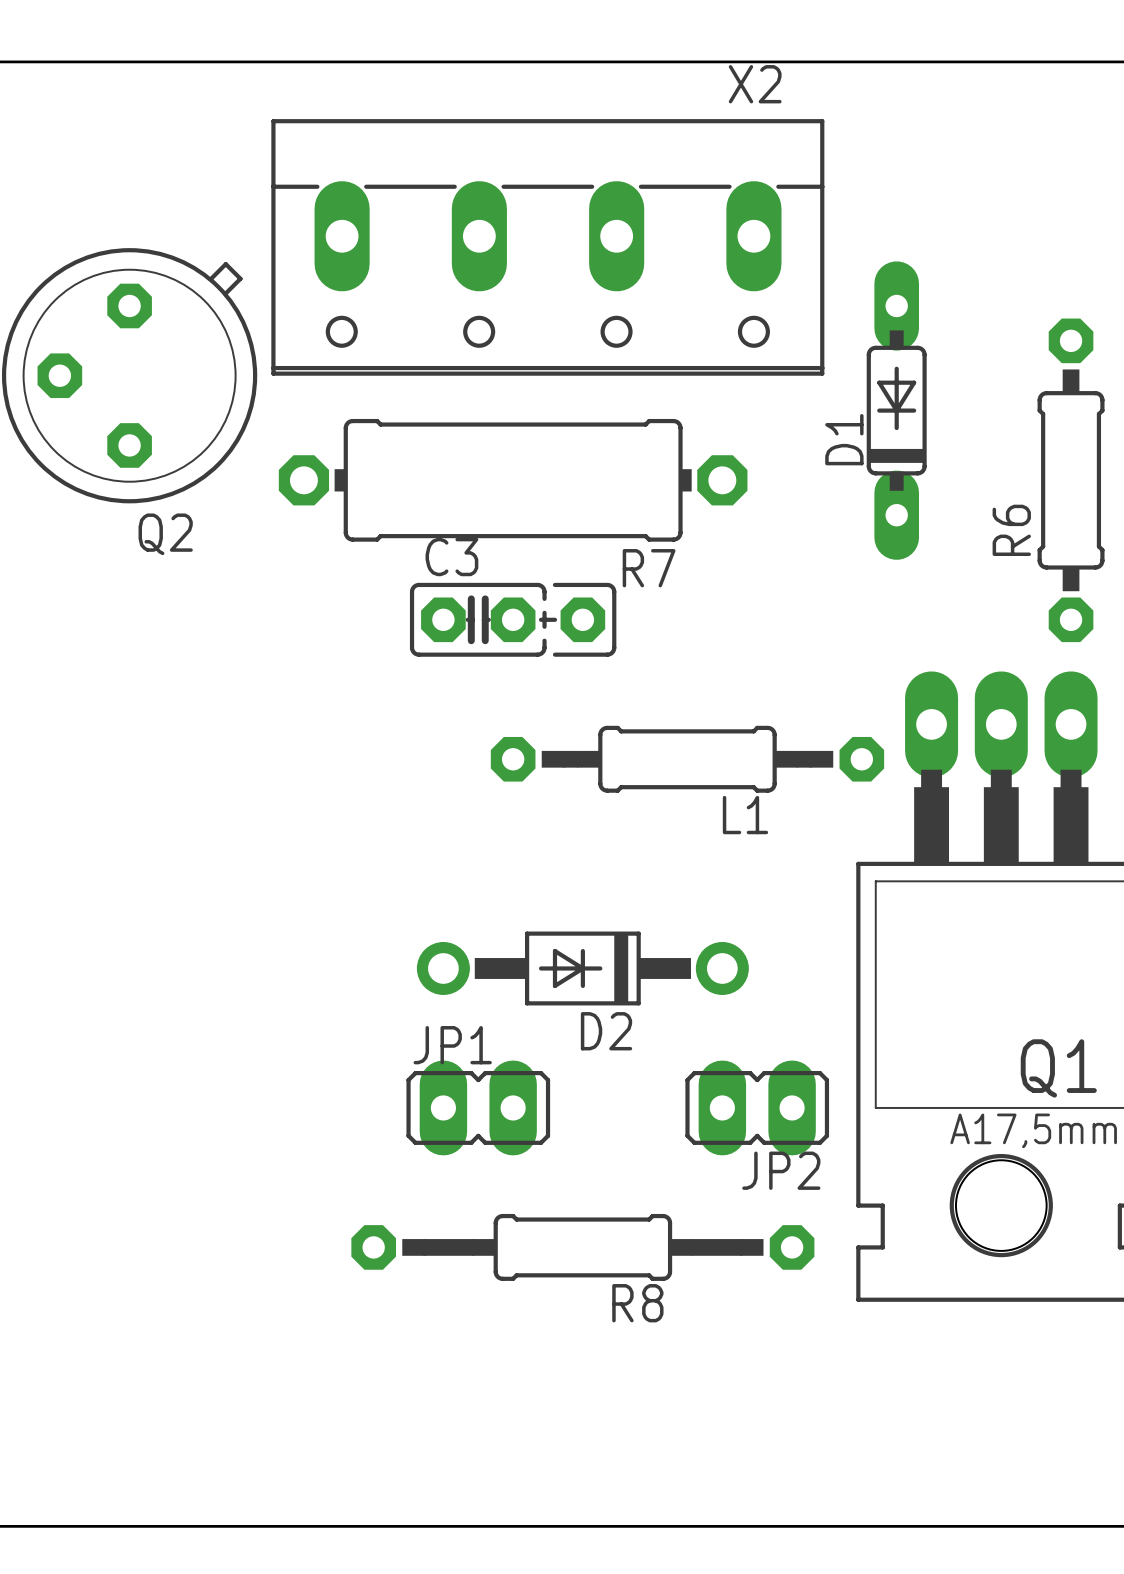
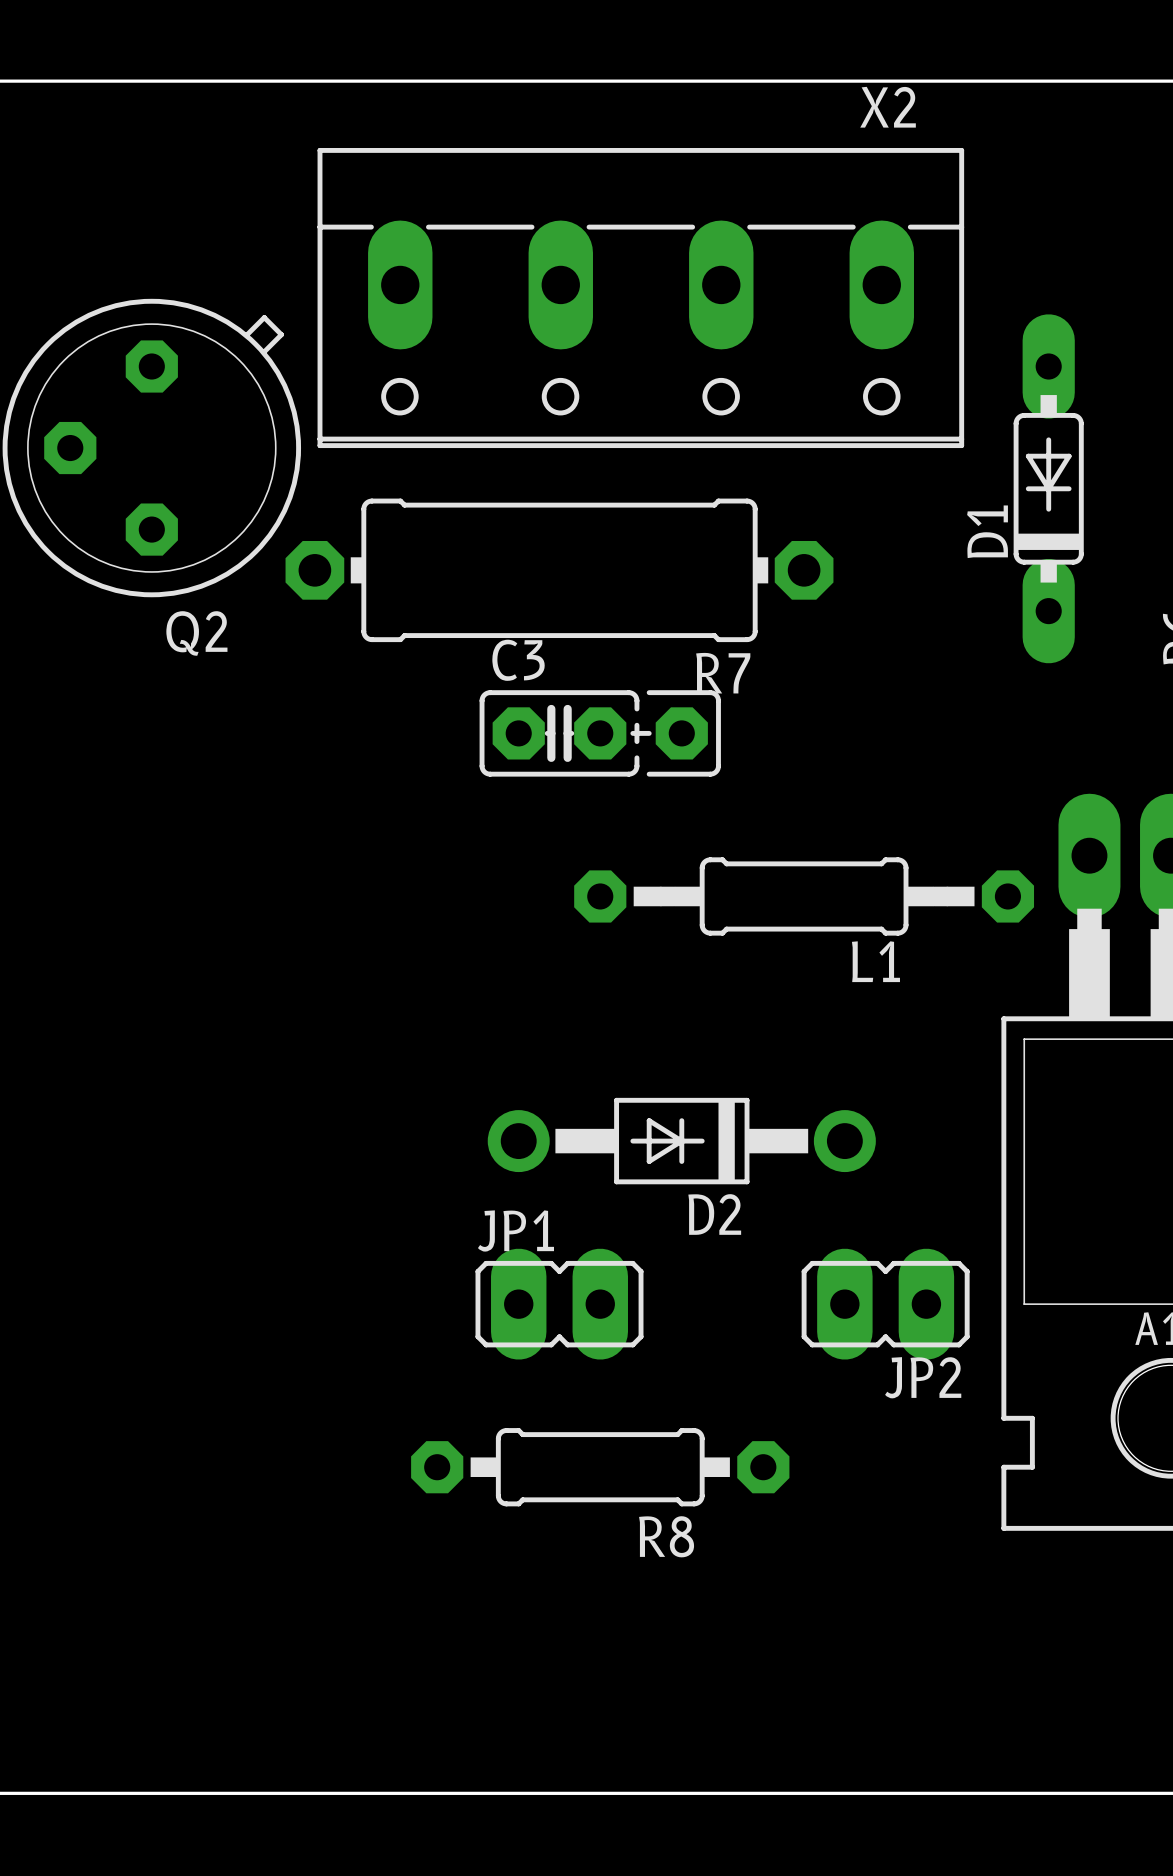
R7 position: (513, 480) -> (559, 570)
R8 footprint: [351, 1213, 815, 1281] -> [411, 1428, 790, 1507]

